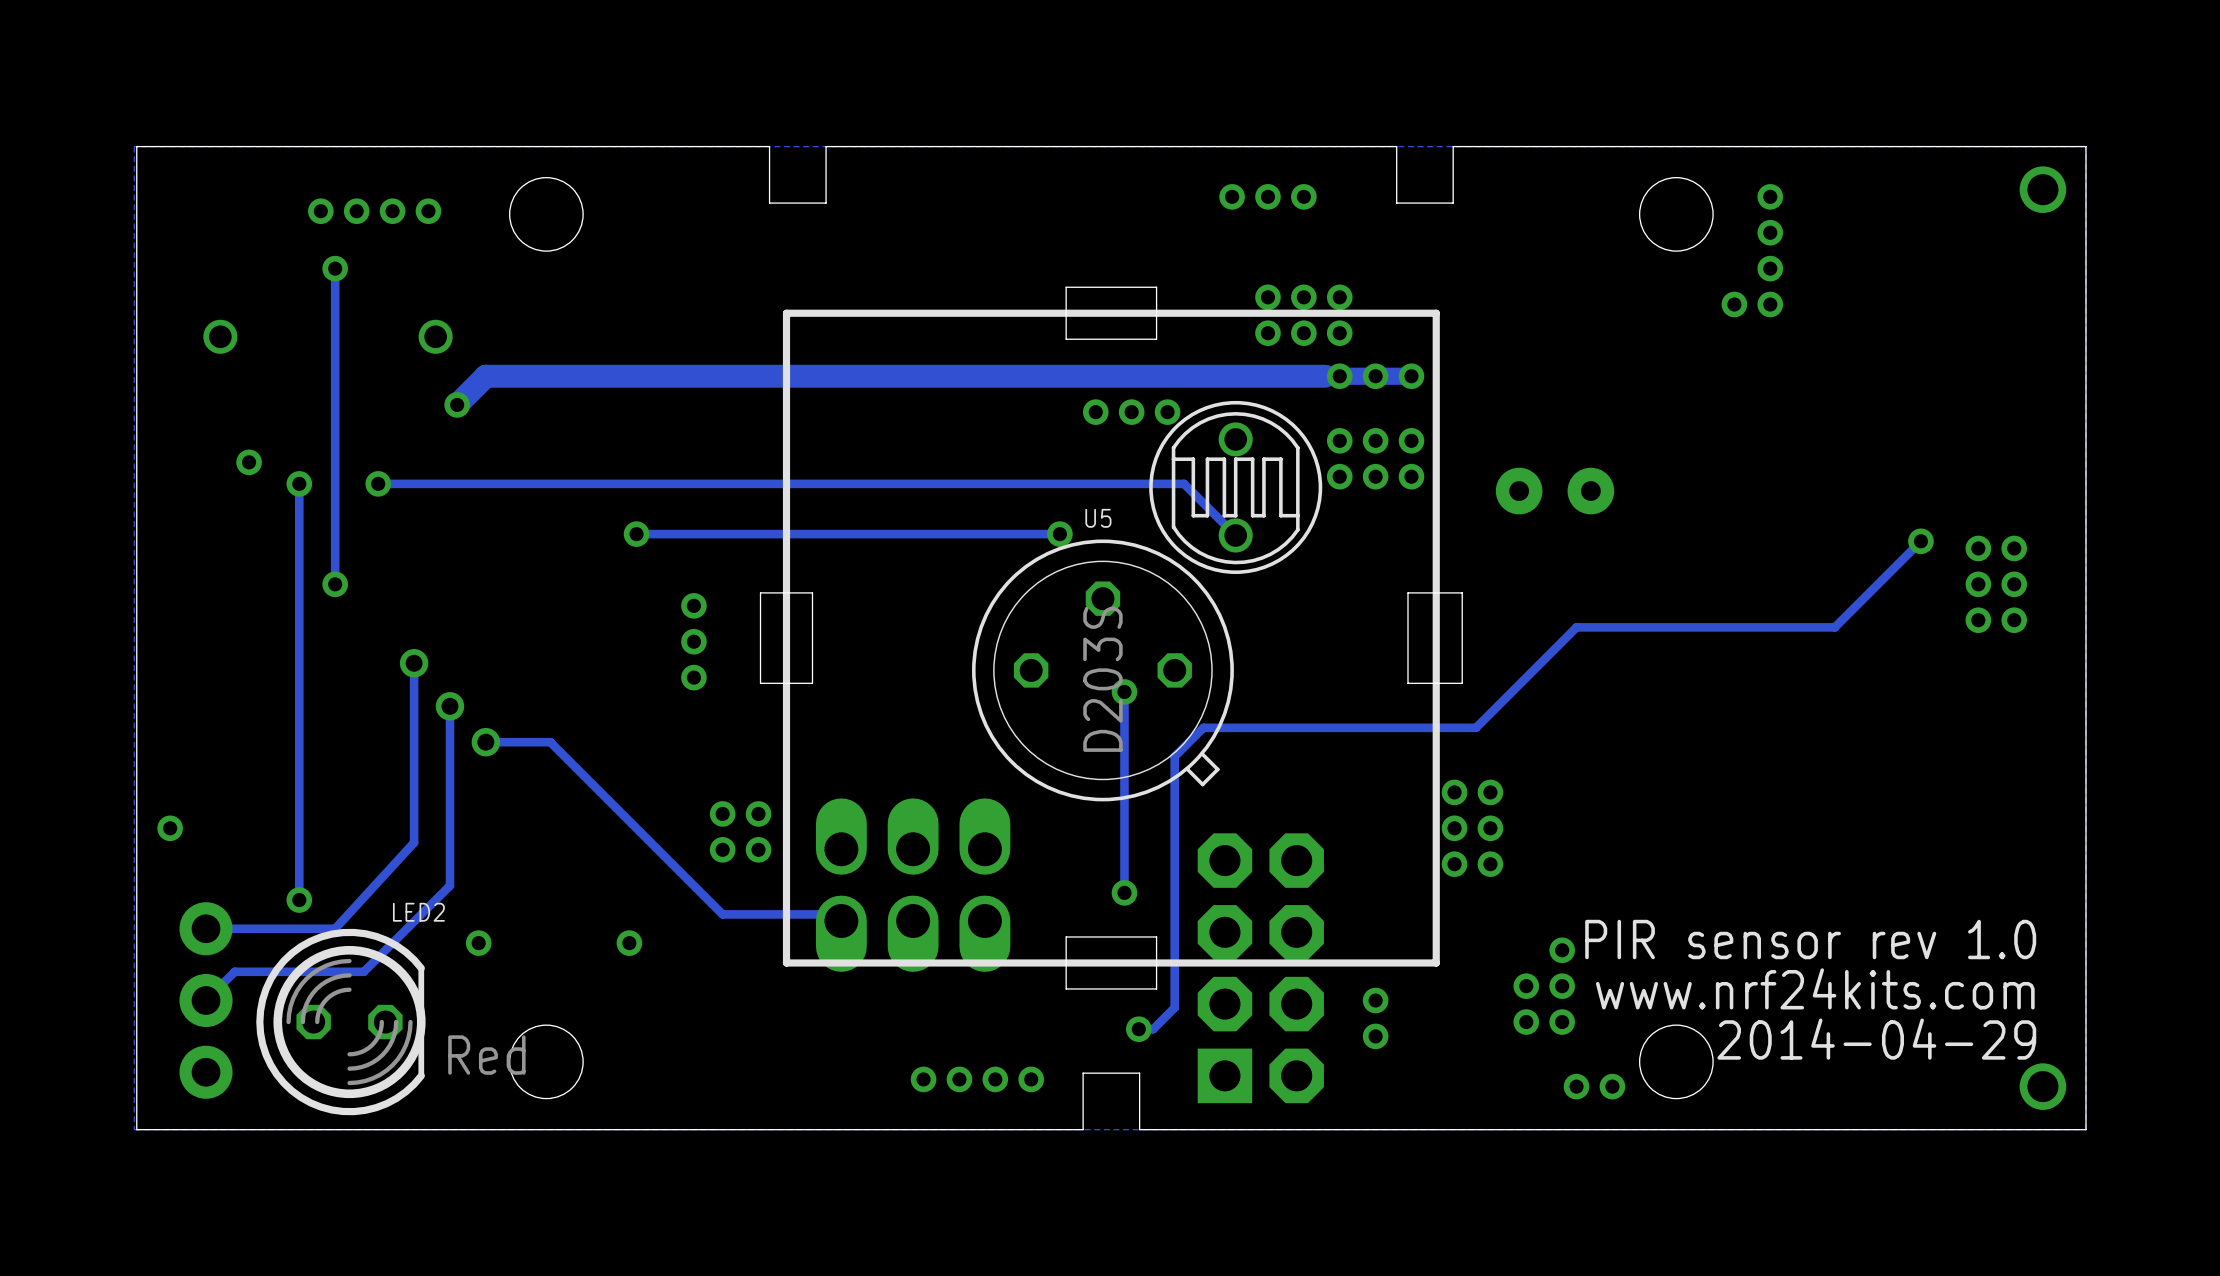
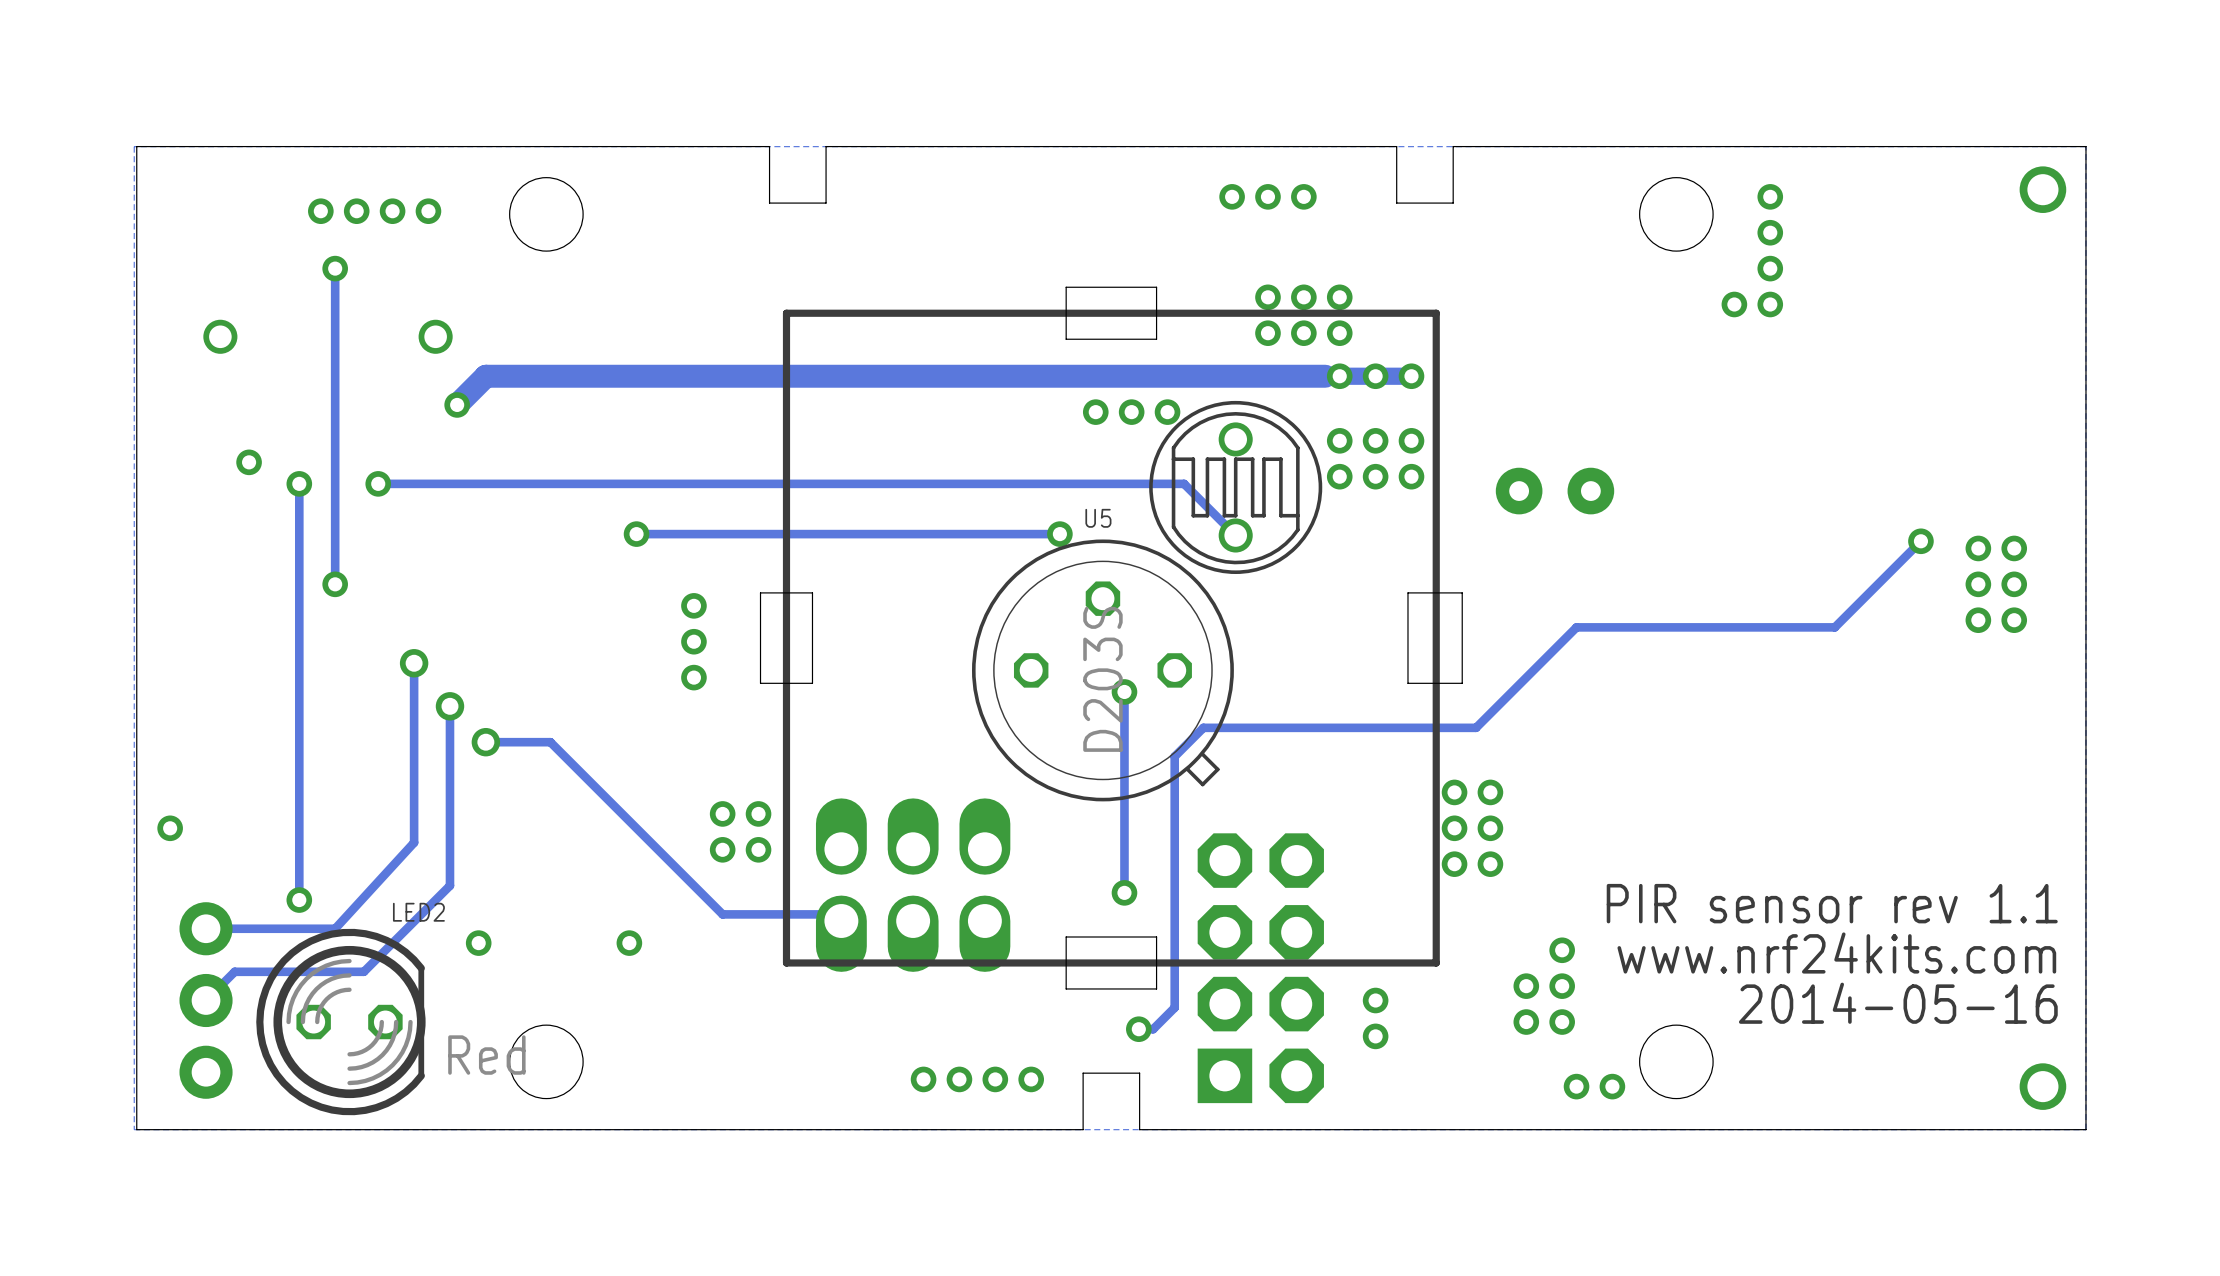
text: PIR sensor rev 1.0 (1810, 939) -> PIR sensor rev 1.1 (1832, 903)
text position: www.nrf24kits.com (1815, 988) -> www.nrf24kits.com (1836, 953)
text: 2014-04-29 (1876, 1039) -> 2014-05-16 (1898, 1003)

